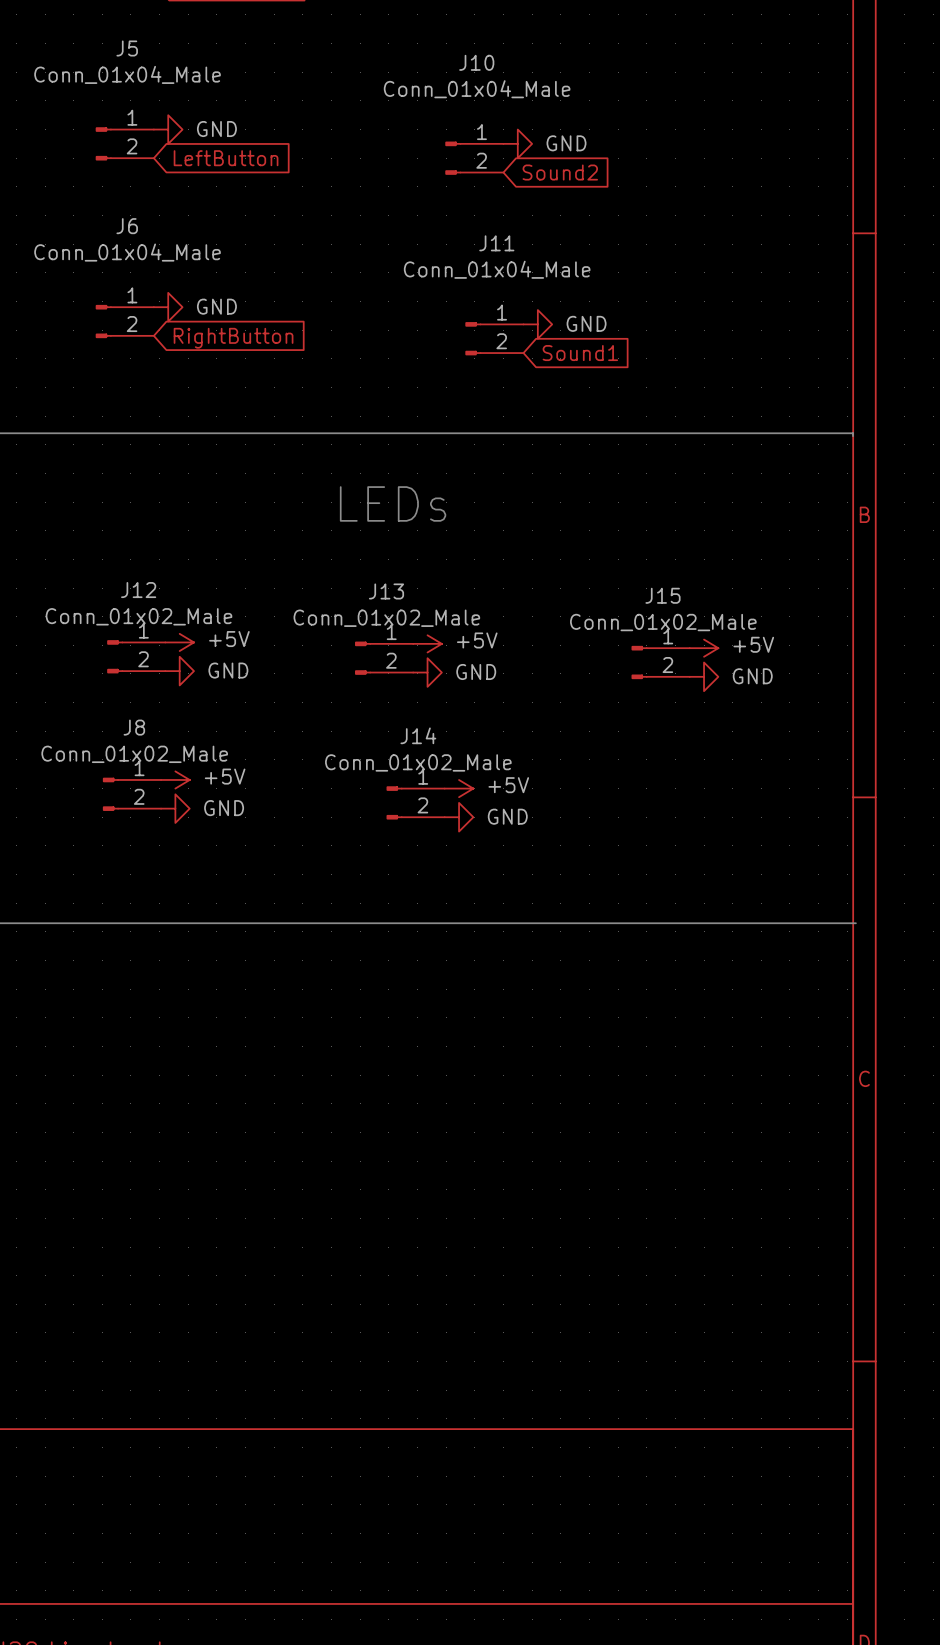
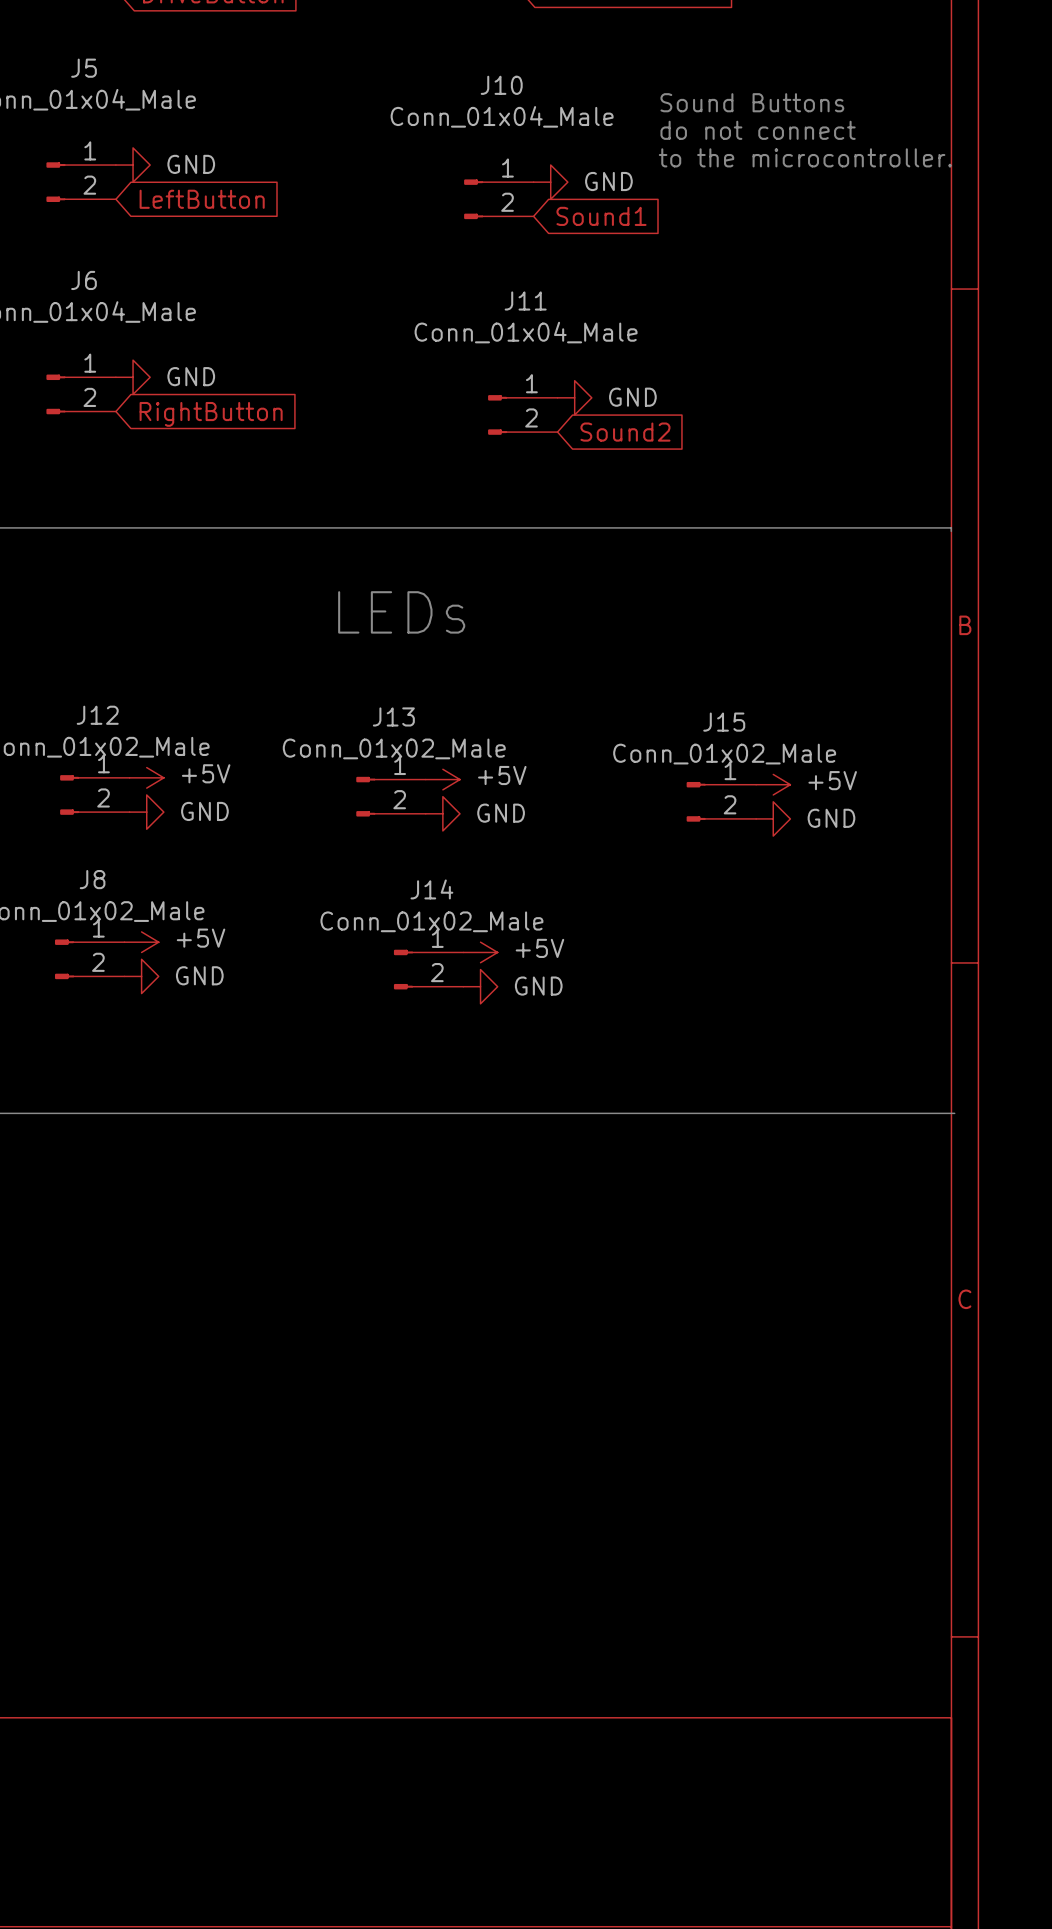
text: none -> Sound Buttons (752, 102)
text: none -> do not connect (758, 130)
text: none -> to the microcontroller. (805, 157)
global label: Sound2 (560, 172) -> Sound1 (601, 216)
global label: Sound1 (580, 353) -> Sound2 (625, 432)

